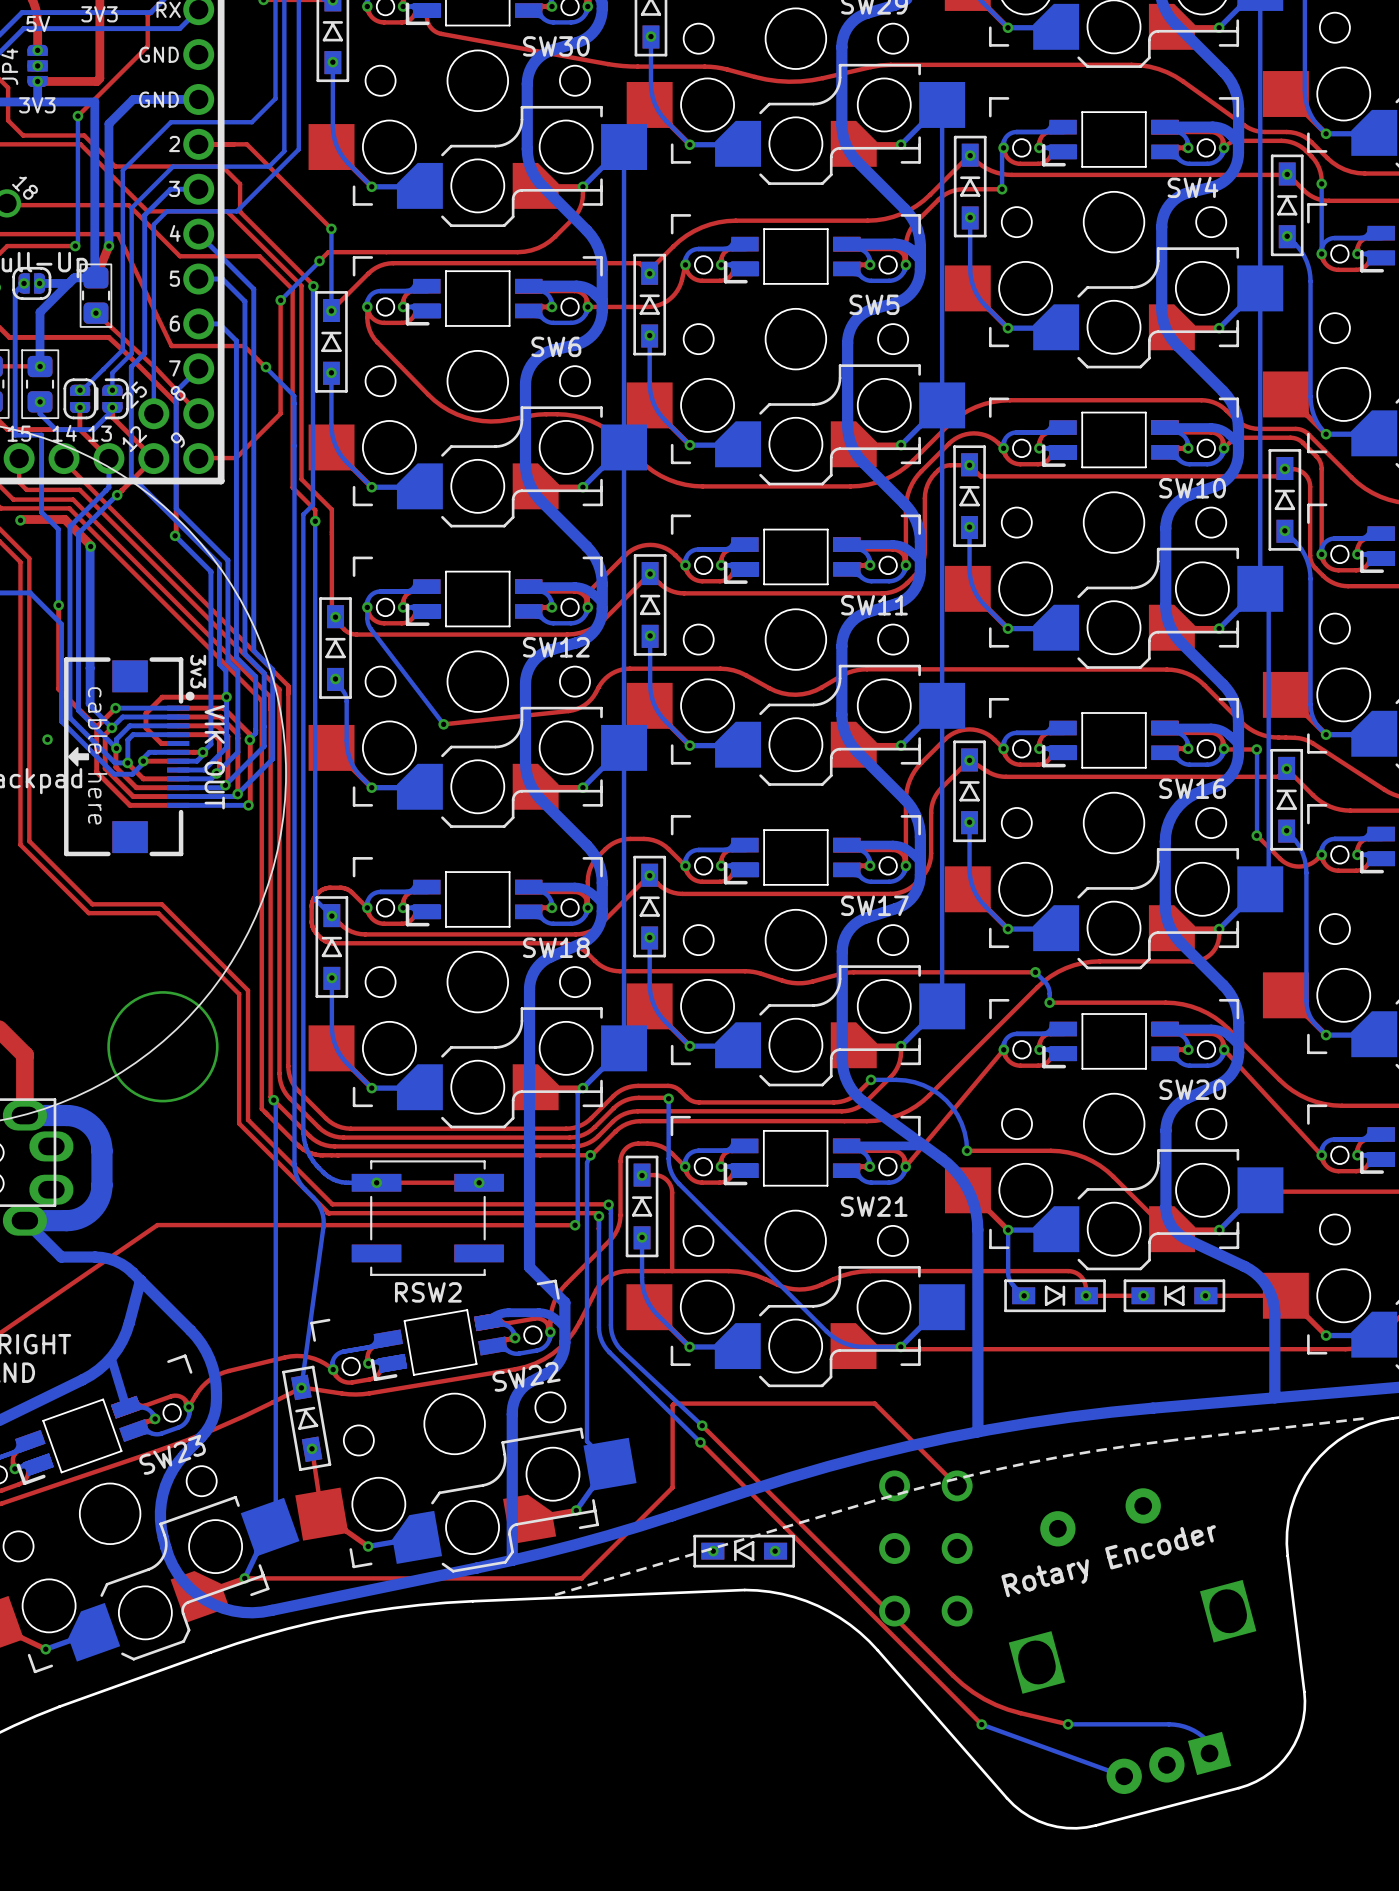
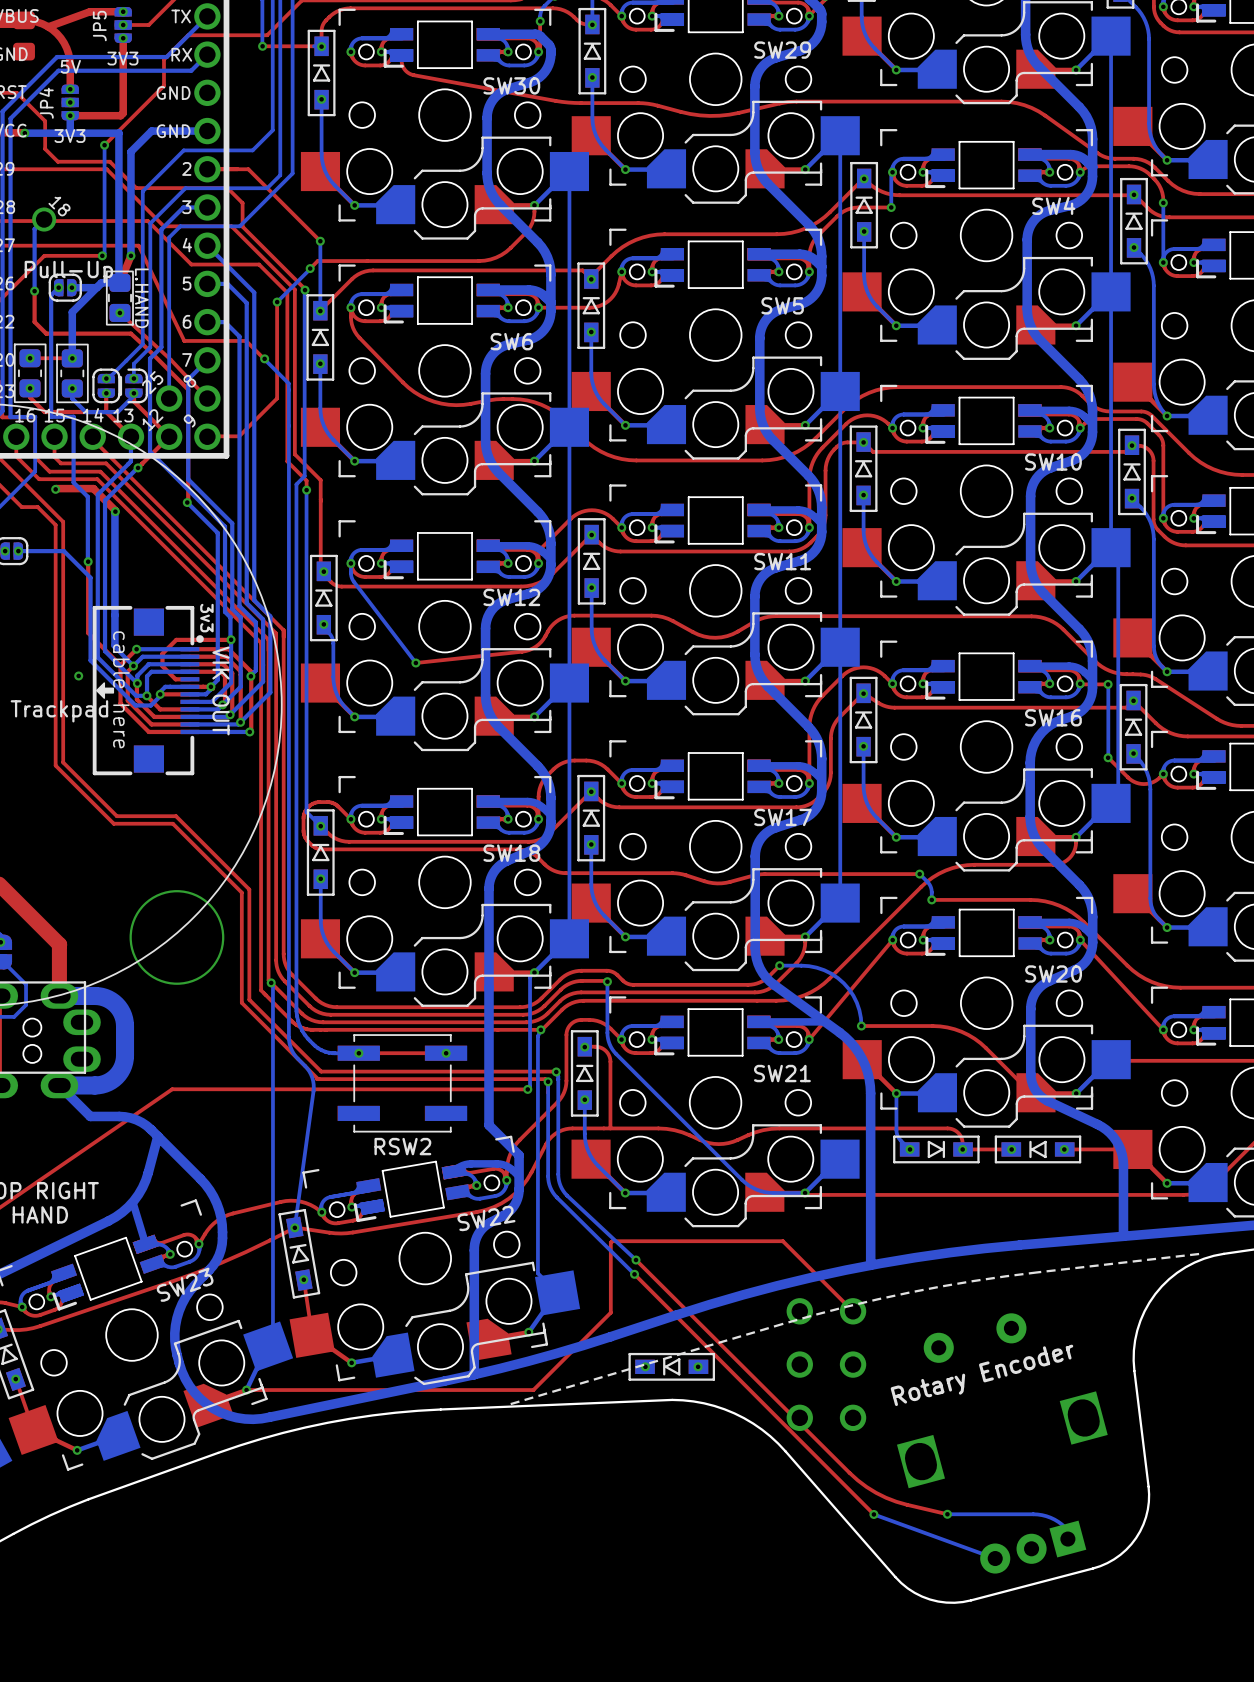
part text: none -> L.HAND (141, 298)

